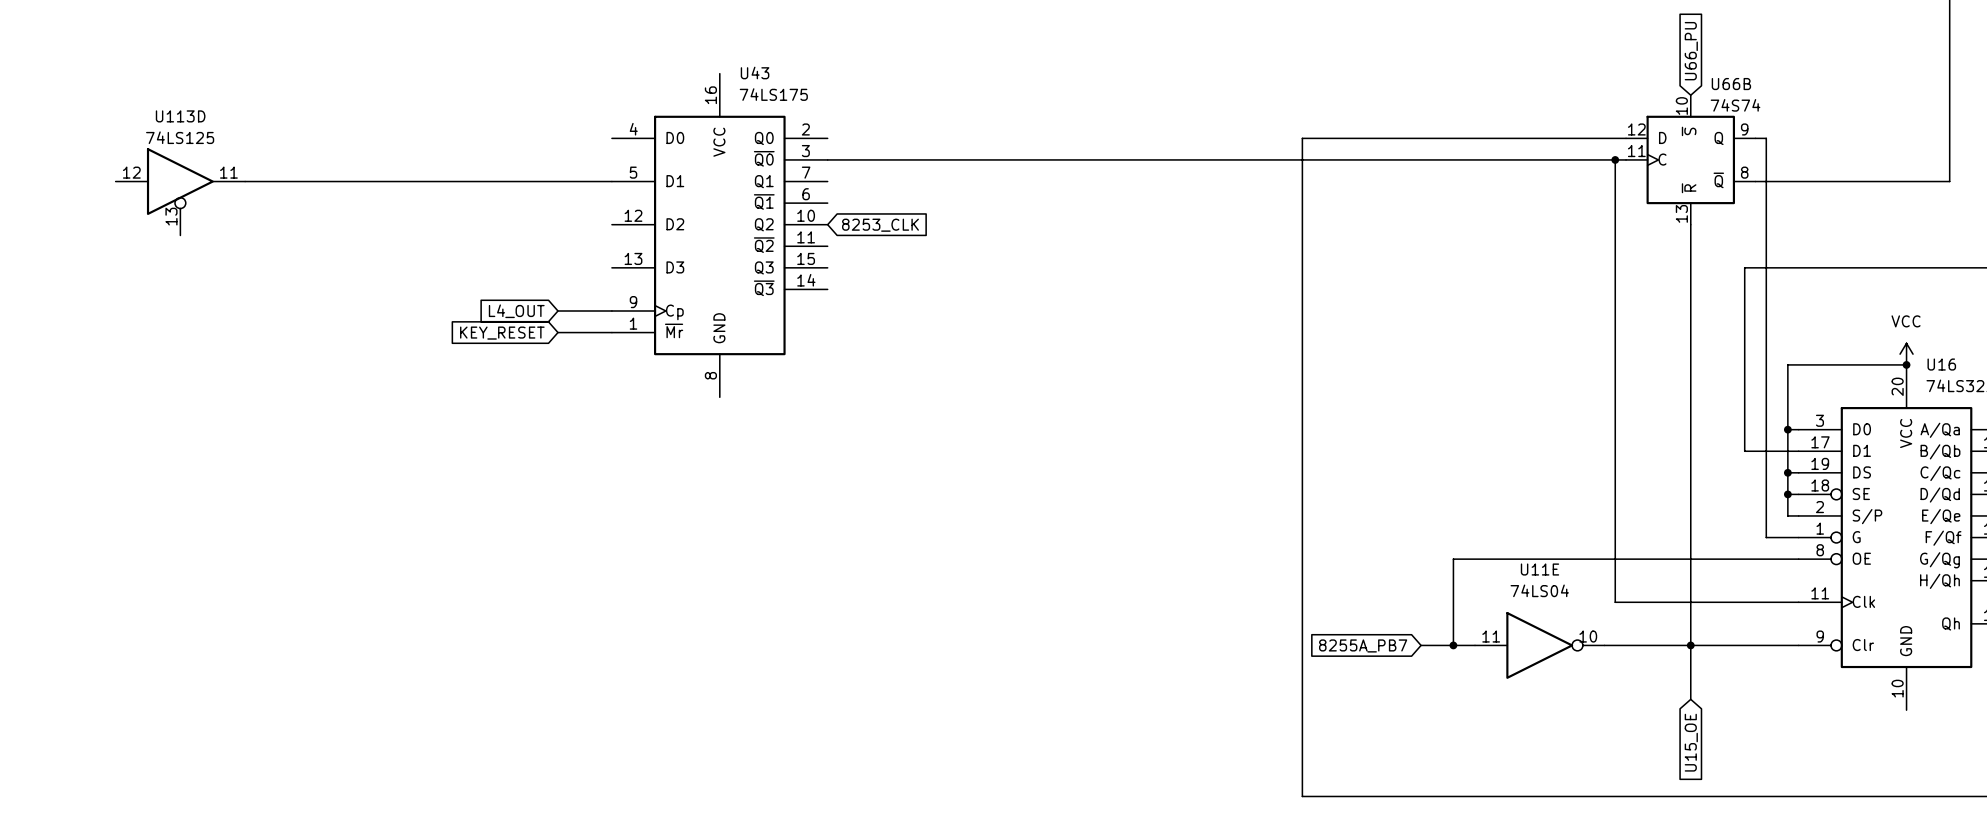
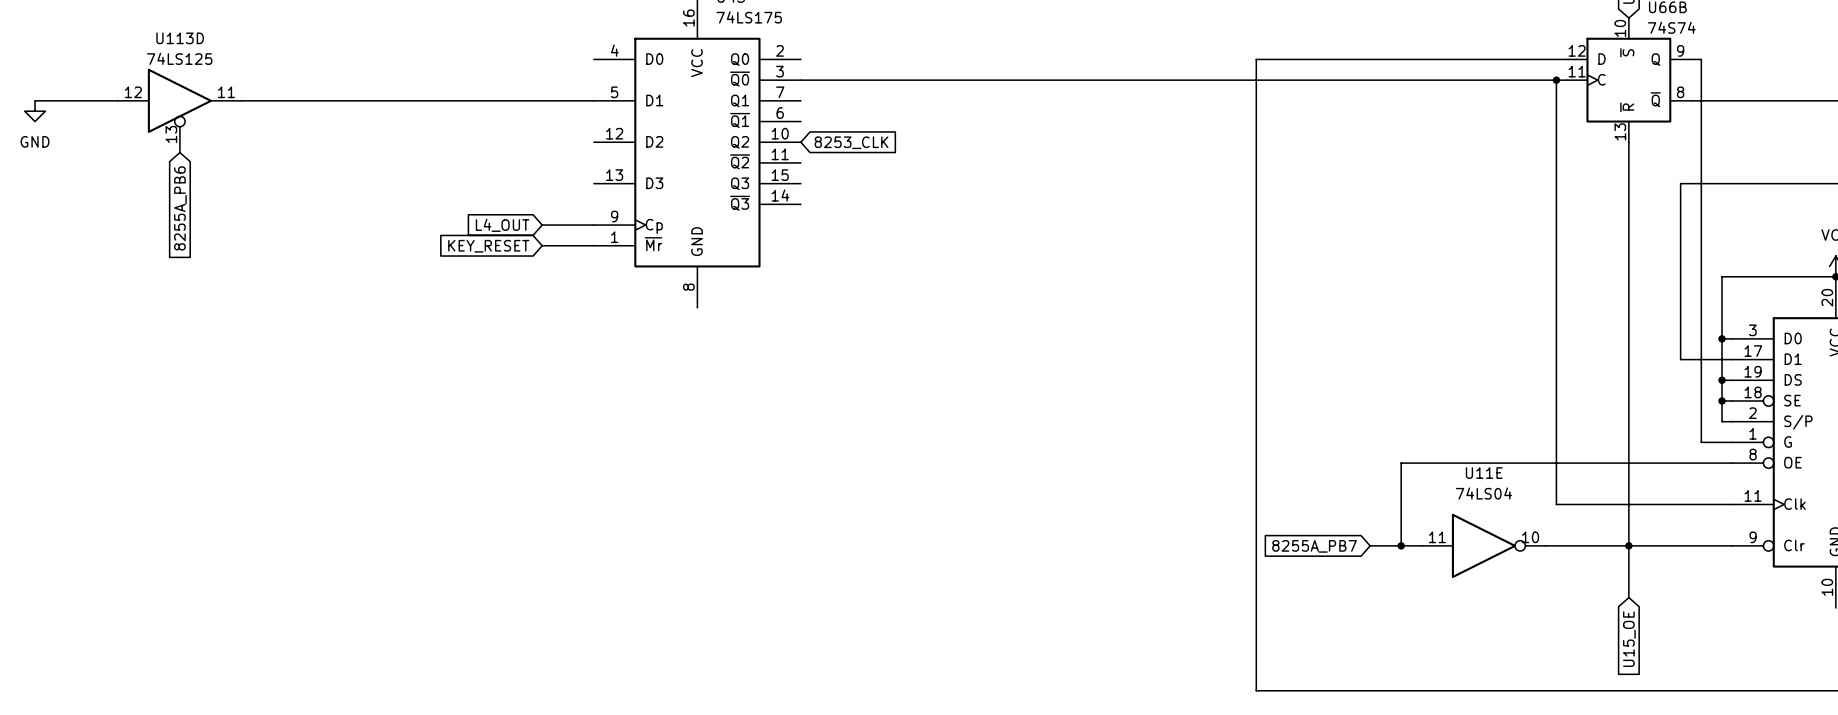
wire: none -> (35, 100) (117, 100)
power symbol: none -> GND (35, 111)
global label: none -> 8255A_PB6 (180, 208)

